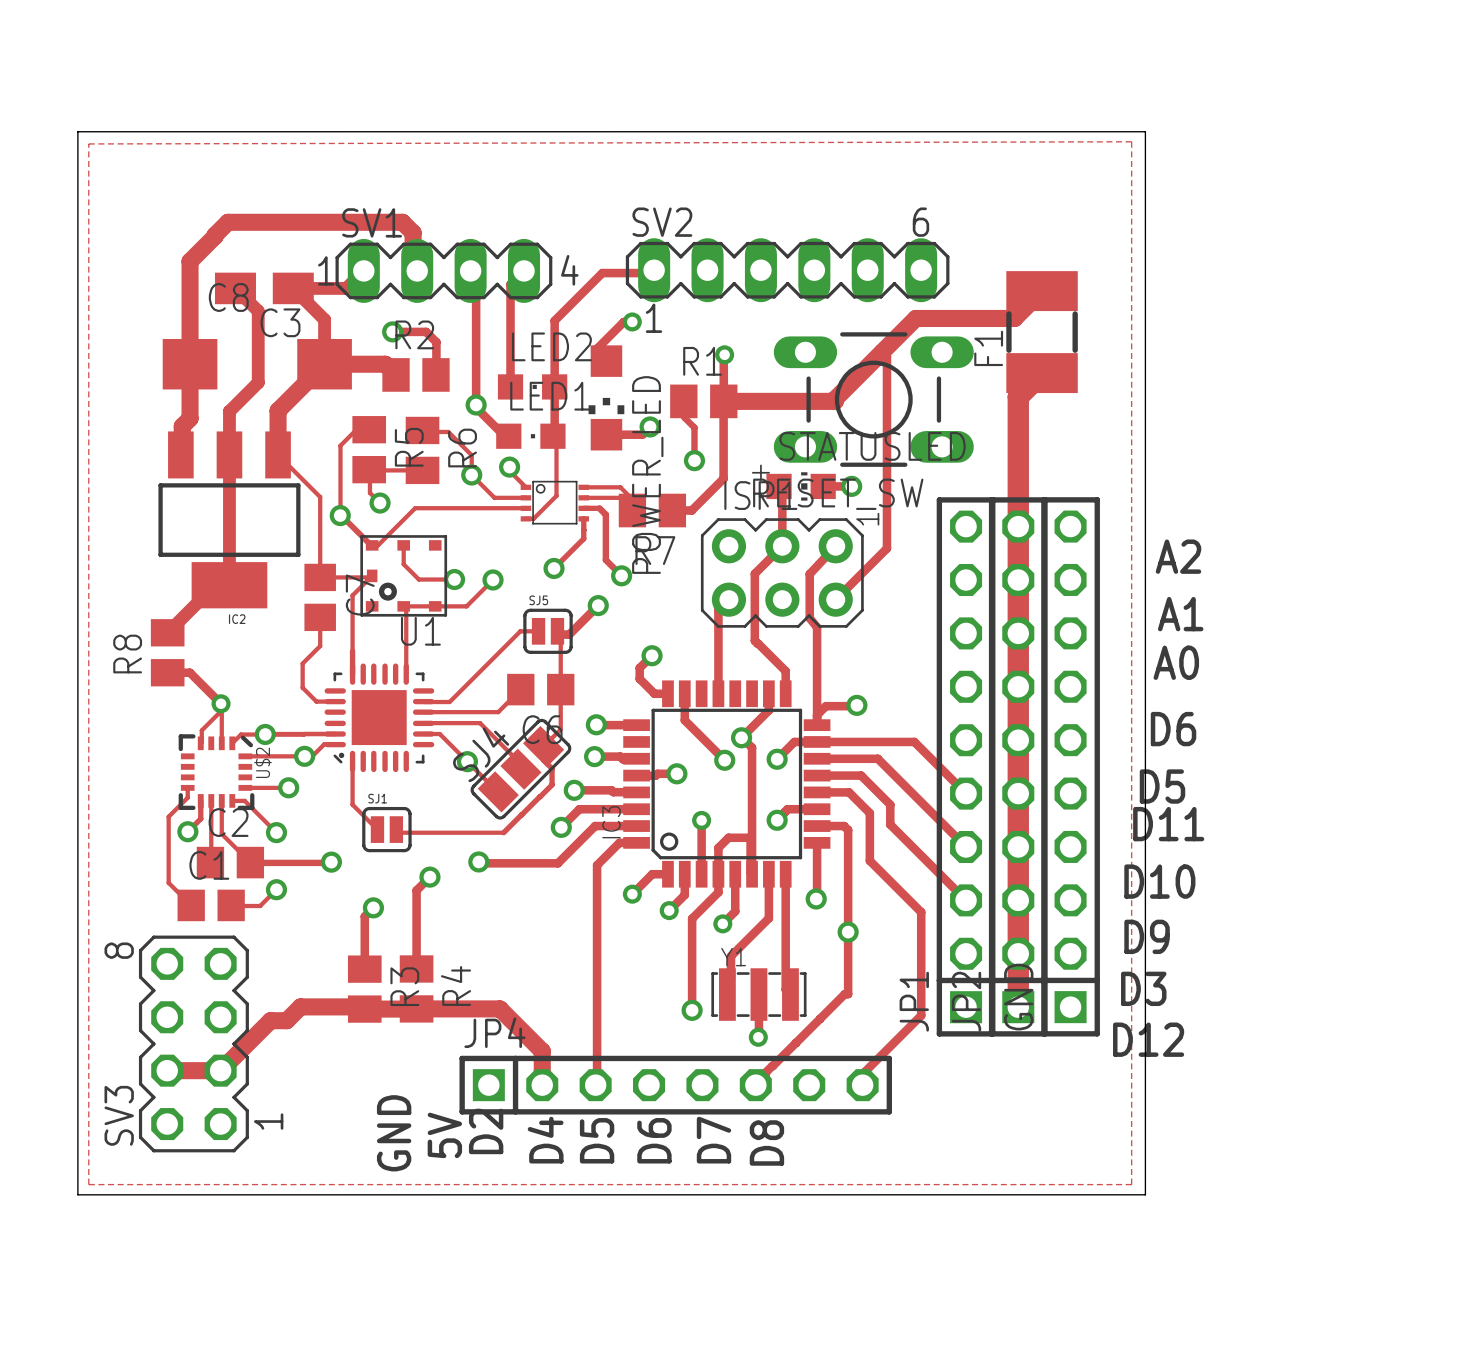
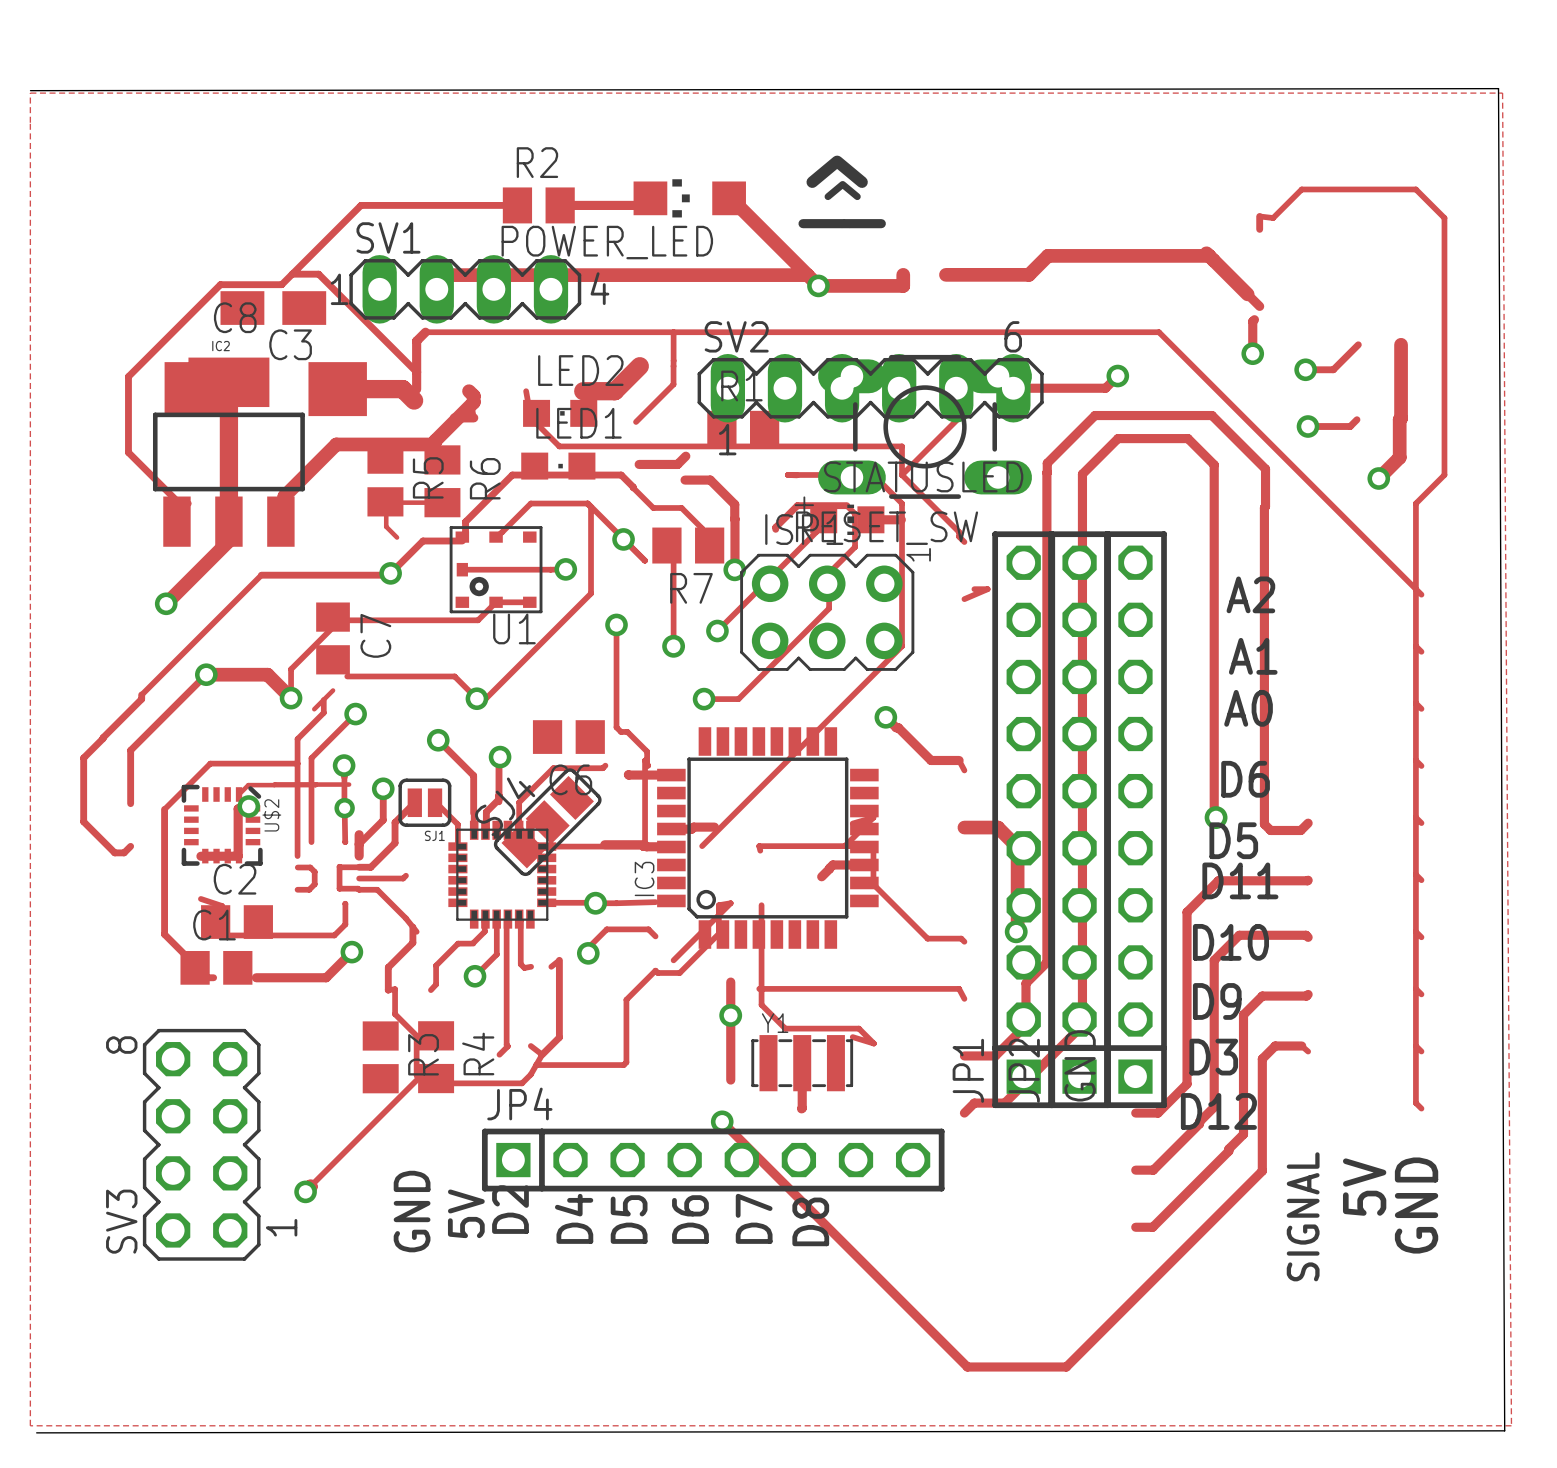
board edge: none -> (30, 90) (1498, 88) (1504, 1430) (36, 1432)
board edge: (77, 131) (1145, 131) (1145, 1194) (77, 1194) (77, 131) -> none
zone outline: (1131, 141) (1131, 1184) (88, 1184) (88, 143) (1131, 141) -> (30, 93) (30, 1425) (1511, 1425) (1502, 93) (30, 93)
text: none -> ^ (837, 171)
text: none -> ^ (842, 190)
track: none -> (650, 198) (650, 205) (560, 205)
track: none -> (729, 198) (818, 285) (903, 285) (903, 274)
track: none -> (517, 205) (361, 205) (281, 284) (220, 284) (128, 376) (128, 452) (179, 503) (188, 503) (176, 521)
text: none -> _ (842, 223)
track: none -> (1259, 229) (1259, 216) (1273, 218) (1301, 189) (1415, 189) (1444, 218) (1444, 474) (1415, 503) (1415, 1103) (1421, 1108)
track: none -> (1206, 253) (1259, 306)
track: none -> (1209, 255) (1047, 255) (1029, 274) (945, 274)
track: none -> (292, 274) (318, 274) (416, 372)
track: none -> (436, 274) (807, 275)
via: none -> (818, 285)
track: (417, 270) (413, 266) (413, 232) (402, 222) (227, 222) (190, 261) (190, 418) (182, 426) (180, 454) -> none
track: (470, 270) (476, 276) (476, 407) (504, 436) (508, 436) -> none
track: (524, 270) (510, 284) (510, 386) -> none
track: (654, 270) (651, 273) (602, 273) (554, 320) (554, 434) (552, 436) (556, 439) (556, 495) (533, 518) (525, 518) -> none
SV2 position: (787, 270) -> (870, 388)
track: (353, 281) (363, 270) (346, 288) (293, 288) (324, 319) (324, 364) (278, 410) (278, 454) (320, 497) (320, 577) (370, 577) -> none
track: (235, 288) (258, 311) (258, 382) (229, 411) (229, 585) (215, 585) (167, 632) -> none
track: (1042, 291) (1014, 318) (915, 318) (835, 399) (835, 401) (723, 401) (724, 354) -> none
track: none -> (1254, 319) (1252, 321) (1252, 353)
track: none -> (673, 332) (673, 384) (636, 421)
track: (632, 321) (623, 321) (597, 348) (597, 351) (606, 361) -> none
via: (632, 321) -> none
track: none -> (1358, 344) (1333, 369) (1305, 369)
track: none -> (1401, 344) (1399, 457) (1378, 478)
track: (392, 331) (426, 331) (436, 342) (435, 374) -> none
via: (392, 331) -> none
via: none -> (1252, 353)
F1: (1042, 332) -> none
track: none -> (639, 366) (614, 391) (583, 391)
via: none -> (1305, 369)
track: (882, 351) (886, 356) (886, 548) (835, 599) -> none
track: none -> (1117, 376) (1105, 388) (1013, 388)
via: none -> (1117, 376)
via: (724, 354) -> none
track: none -> (228, 382) (228, 541) (166, 603)
track: none -> (956, 388) (959, 389) (959, 417) (902, 474)
track: none -> (411, 391) (416, 389) (416, 341) (425, 332) (1158, 332) (1421, 594)
track: none -> (526, 391) (530, 417) (559, 446) (902, 446) (902, 474)
track: (1042, 373) (1018, 396) (1018, 1007) -> none
R2 position: (416, 374) -> (538, 205)
track: none -> (454, 417) (473, 417) (469, 391) (473, 395) (473, 402) (435, 440) (432, 444) (336, 444) (284, 496) (284, 518) (280, 521) (273, 503)
track: none -> (1356, 419) (1350, 426) (1308, 426)
POWER_LED rotation: 0° (606, 397) -> 90° clockwise (689, 198)
POWER_LED position: (606, 397) -> (689, 198)
via: none -> (1308, 426)
track: (683, 401) (684, 417) (694, 427) (694, 460) -> none
track: (735, 401) (723, 413) (723, 478) (691, 510) (672, 510) -> none
via: (476, 404) -> none
via: (650, 426) -> none
track: (369, 429) (356, 429) (340, 445) (340, 513) (372, 545) -> none
track: (423, 429) (424, 431) (448, 431) (471, 455) (471, 475) (494, 497) (525, 497) -> none
track: none -> (844, 474) (787, 474) (797, 475)
track: none -> (873, 474) (902, 503) (902, 646) (702, 846)
track: none -> (902, 474) (959, 532) (959, 536) (964, 542)
via: none -> (1378, 478)
track: none -> (685, 480) (710, 480) (734, 504) (734, 519)
via: (694, 460) -> none
track: (509, 467) (509, 470) (525, 487) -> none
via: (509, 467) -> none
track: none -> (587, 503) (645, 560)
via: (471, 475) -> none
track: none -> (734, 519) (734, 569)
track: (779, 486) (782, 489) (782, 546) (754, 573) (754, 640) (785, 671) (785, 693) -> none
via: (851, 486) -> none
track: (583, 487) (620, 487) (631, 498) (631, 509) -> none
track: none -> (775, 529) (797, 505) (846, 505) (855, 513) (855, 547) (829, 573) (829, 608) (738, 699) (704, 699)
track: none -> (818, 529) (717, 631)
track: (583, 497) (619, 497) (632, 510) -> none
track: none -> (663, 534) (673, 532) (673, 646)
track: none -> (706, 534) (702, 532) (702, 528) (681, 508) (653, 508) (621, 475) (512, 475) (465, 521) (465, 533) (462, 537) (462, 541) (423, 541) (388, 575) (261, 575) (141, 694) (141, 699) (83, 757) (83, 821) (114, 852) (124, 852) (130, 846)
track: none -> (496, 537) (530, 503) (587, 503) (591, 507) (591, 593) (485, 698) (476, 698) (454, 676) (347, 676)
part: (554, 502) -> none
via: (380, 503) -> none
via: none -> (623, 539)
track: (525, 508) (415, 508) (378, 545) (370, 545) (340, 515) -> none
track: (583, 508) (599, 508) (605, 514) (605, 560) (621, 575) -> none
via: (340, 515) -> none
track: (583, 518) (583, 538) (554, 568) -> none
IC2 rotation: 0° (229, 519) -> 180° (228, 452)
track: none -> (565, 569) (462, 569)
via: none -> (565, 569)
via: none -> (734, 569)
via: none -> (390, 573)
track: (403, 545) (403, 564) (418, 579) (454, 579) -> none
track: (835, 546) (809, 574) (809, 618) (817, 627) (817, 725) -> none
track: none -> (974, 589) (987, 589) (964, 599)
track: none -> (529, 602) (496, 602) (478, 620) (340, 620) (291, 669) (291, 698) (267, 674) (206, 674) (130, 750) (130, 803)
via: none -> (166, 603)
via: (554, 568) -> none
track: (372, 575) (352, 595) (352, 674) (352, 651) -> none
U1 position: (403, 575) -> (496, 569)
via: (621, 575) -> none
via: (454, 579) -> none
track: (493, 579) (466, 606) (403, 606) (406, 608) (406, 674) -> none
via: (493, 579) -> none
track: none -> (616, 624) (616, 727) (621, 731) (627, 731) (647, 751) (648, 765) (645, 760) (645, 846) (643, 848) (641, 846) (546, 846)
via: none -> (616, 624)
via: none -> (717, 631)
track: (728, 599) (718, 610) (718, 693) -> none
via: none -> (673, 646)
track: none -> (1415, 646) (1421, 651)
track: (598, 605) (569, 634) (560, 634) -> none
via: (598, 605) -> none
track: (320, 617) (320, 646) -> none
via: none -> (206, 674)
track: (538, 631) (520, 631) (449, 702) (423, 701) -> none
SJ5: (548, 631) -> none
track: (560, 634) (560, 729) (543, 746) (543, 760) (552, 768) (552, 784) (540, 796) -> none
R8: (167, 652) -> none
via: none -> (291, 698)
via: none -> (476, 698)
track: none -> (323, 699) (323, 712) (297, 739) (297, 856)
track: (652, 655) (639, 668) (639, 678) (654, 693) (667, 693) -> none
via position: (652, 655) -> (704, 699)
track: none -> (1415, 703) (1421, 708)
track: (302, 663) (302, 687) (316, 701) (335, 701) -> none
track: none -> (355, 714) (311, 758) (311, 842)
via: none -> (355, 714)
track: none -> (885, 717) (931, 760) (959, 760) (964, 770)
track: (167, 672) (189, 672) (221, 703) -> none
track: (520, 689) (498, 712) (423, 712) -> none
track: none -> (438, 740) (473, 775) (474, 830)
via: none -> (438, 740)
track: (684, 693) (684, 720) (724, 760) -> none
track: (768, 693) (768, 710) (741, 737) (752, 747) (752, 874) (750, 838) (728, 837) (718, 847) (718, 892) (692, 918) -> none
track: (221, 703) (221, 711) (201, 730) (200, 743) -> none
track: (221, 703) (221, 743) -> none
via position: (221, 703) -> (344, 808)
track: (856, 705) (825, 706) (817, 715) -> none
via position: (856, 705) -> (885, 717)
via: none -> (500, 757)
track: none -> (499, 758) (498, 801) (498, 783)
track: none -> (1415, 760) (1421, 765)
track: none -> (297, 763) (210, 763) (164, 809) (164, 934) (207, 977) (213, 977)
track: none -> (344, 765) (345, 842)
via: none -> (344, 765)
track: none -> (605, 765) (602, 768) (553, 768) (519, 802) (519, 830)
part: (379, 717) -> none
track: (423, 723) (480, 723) (520, 764) (520, 769) -> none
via: (596, 724) -> none
via: (265, 734) -> none
track: (423, 734) (439, 734) (497, 791) (505, 791) -> none
track: none -> (383, 788) (383, 820) (359, 844)
via: none -> (383, 788)
via: (741, 737) -> none
track: (335, 744) (324, 744) (312, 756) (245, 756) -> none
track: none -> (499, 795) (499, 799) (486, 811) (485, 830) (485, 820)
track: none -> (414, 802) (395, 822) (395, 843) (370, 867) (339, 866) (339, 888) (377, 889) (416, 931)
track: none -> (435, 802) (457, 824) (457, 846)
track: none -> (248, 806) (248, 808) (238, 808) (238, 856) (200, 856)
via: none -> (248, 806)
via: (304, 756) -> none
track: (594, 756) (636, 758) -> none
via: (594, 756) -> none
track: (817, 758) (877, 758) (966, 847) -> none
track: (777, 759) (794, 741) (914, 741) (966, 793) -> none
via: (777, 759) -> none
via: (724, 760) -> none
track: (352, 761) (352, 804) (377, 829) -> none
via: (467, 761) -> none
track: none -> (1216, 817) (1214, 815) (1214, 464) (1187, 438) (1118, 438) (1082, 474) (1082, 1025) (1004, 1103) (974, 1103) (964, 1113)
via: none -> (1216, 817)
track: none -> (1415, 817) (1421, 823)
track: none -> (852, 823) (873, 817) (844, 846)
track: none -> (1308, 823) (1300, 830) (1270, 830) (1264, 824) (1265, 469) (1212, 415) (1095, 415) (1047, 463) (1046, 962) (1025, 983) (1025, 1025) (995, 1055) (964, 1055)
via: (676, 773) -> none
track: none -> (964, 827) (997, 827) (1017, 847) (1016, 931)
track: (817, 775) (861, 775) (890, 804) (890, 824) (966, 900) -> none
track: none -> (359, 834) (359, 856)
track: (187, 787) (187, 797) (168, 816) (168, 882) (191, 905) -> none
track: (245, 787) (288, 787) -> none
via: (288, 787) -> none
via: (574, 790) -> none
track: (817, 792) (849, 792) (869, 813) (869, 860) (921, 912) (921, 1015) (864, 1072) (864, 1083) -> none
track: none -> (760, 850) (759, 846) (873, 846) (873, 884) (927, 938) (961, 938) (964, 941)
track: (539, 796) (503, 832) (395, 832) (396, 829) -> none
track: (200, 800) (200, 818) (187, 831) -> none
track: (211, 800) (210, 862) -> none
track: (221, 800) (221, 833) (250, 862) (331, 862) -> none
track: (232, 800) (244, 800) (276, 832) -> none
track: (636, 809) (579, 809) (561, 827) -> none
track: none -> (297, 867) (310, 867) (314, 871) (314, 884) (309, 889) (297, 889)
part: none -> (502, 874)
track: none -> (1415, 874) (1421, 880)
track: none -> (405, 875) (403, 878) (359, 878)
track: (701, 820) (701, 874) -> none
via: (701, 820) -> none
via: (777, 820) -> none
track: none -> (1308, 880) (1218, 880) (1187, 912) (1187, 1084) (1158, 1113) (1135, 1113)
track: (636, 826) (595, 826) (557, 863) (478, 861) -> none
track: (817, 826) (844, 826) (848, 830) (848, 994) (844, 994) (765, 1072) (765, 1075) (755, 1085) -> none
via position: (561, 827) -> (595, 903)
SJ1 rotation: 0° (386, 829) -> 180° (424, 802)
SJ1 position: (386, 829) -> (424, 802)
via: (187, 831) -> none
via: (276, 832) -> none
track: none -> (200, 898) (222, 905) (222, 929) (227, 935) (334, 935) (345, 924) (345, 903)
track: (636, 842) (619, 842) (597, 865) (595, 1085) -> none
track: (817, 842) (816, 899) -> none
track: none -> (655, 902) (546, 902)
track: none -> (761, 905) (761, 1004) (785, 1028) (858, 1028) (873, 1043) (852, 1037)
track: none -> (496, 919) (496, 954) (475, 976)
track: none -> (507, 919) (507, 1046)
track: none -> (519, 919) (520, 920) (520, 964) (524, 967) (531, 966)
via: (478, 861) -> none
via: (331, 862) -> none
track: none -> (482, 921) (485, 919) (484, 931) (473, 943) (458, 943) (436, 965) (436, 984) (430, 990)
track: none -> (412, 927) (412, 942) (388, 967) (388, 990) (395, 989) (395, 1014) (416, 1035) (416, 1075) (424, 1083) (522, 1083) (530, 1074) (542, 1054)
via: none -> (1016, 931)
track: none -> (1415, 931) (1421, 937)
track: (667, 874) (652, 874) (632, 894) -> none
track: (684, 874) (684, 895) (669, 910) -> none
track: (735, 874) (735, 911) (722, 923) -> none
track: (768, 874) (768, 918) (730, 956) (730, 977) (726, 981) (727, 994) -> none
track: (785, 874) (785, 989) (790, 994) -> none
track: none -> (655, 936) (648, 929) (606, 929) (588, 947) (588, 953)
track: none -> (1308, 937) (1306, 935) (1239, 935) (1214, 960) (1214, 1107) (1153, 1170) (1135, 1170)
track: (429, 877) (416, 890) (416, 968) -> none
via: (429, 877) -> none
track: (276, 889) (260, 906) (231, 905) -> none
via: (276, 889) -> none
track: none -> (351, 952) (326, 977) (256, 977)
via: none -> (351, 952)
via: none -> (588, 953)
via: (632, 894) -> none
track: none -> (673, 960) (730, 903) (718, 905) (718, 933) (679, 972) (657, 972) (655, 970) (626, 999) (626, 1062) (623, 1065) (536, 1065)
via: (816, 899) -> none
track: none -> (551, 966) (559, 960) (559, 1037) (542, 1054)
track: (373, 907) (364, 916) (364, 969) (371, 978) -> none
via: (373, 907) -> none
via: (669, 910) -> none
via: none -> (475, 976)
via: (722, 923) -> none
track: none -> (759, 988) (959, 988) (964, 998)
track: none -> (1415, 988) (1421, 994)
track: none -> (1308, 994) (1306, 996) (1262, 996) (1243, 1014) (1243, 1134) (1152, 1227) (1135, 1227)
via: (848, 932) -> none
via: none -> (730, 1015)
track: none -> (507, 1046) (499, 1054)
track: none -> (530, 1046) (542, 1054)
track: none -> (1415, 1046) (1421, 1051)
track: none -> (1308, 1051) (1301, 1046) (1275, 1046) (1262, 1058) (1262, 1171) (1066, 1367) (967, 1367) (722, 1121)
track: none -> (419, 1077) (305, 1191)
via position: (692, 1010) -> (722, 1121)
via: (758, 1037) -> none
SV3 position: (193, 1043) -> (201, 1144)
track: (167, 1070) (220, 1070) (270, 1020) (286, 1020) (300, 1006) (362, 1006) (364, 1009) (499, 1008) (542, 1051) (542, 1085) -> none
text: none -> 5V (1364, 1187)
via: none -> (305, 1191)
text: none -> GND (1416, 1205)
text: none -> SIGNAL (1303, 1216)

